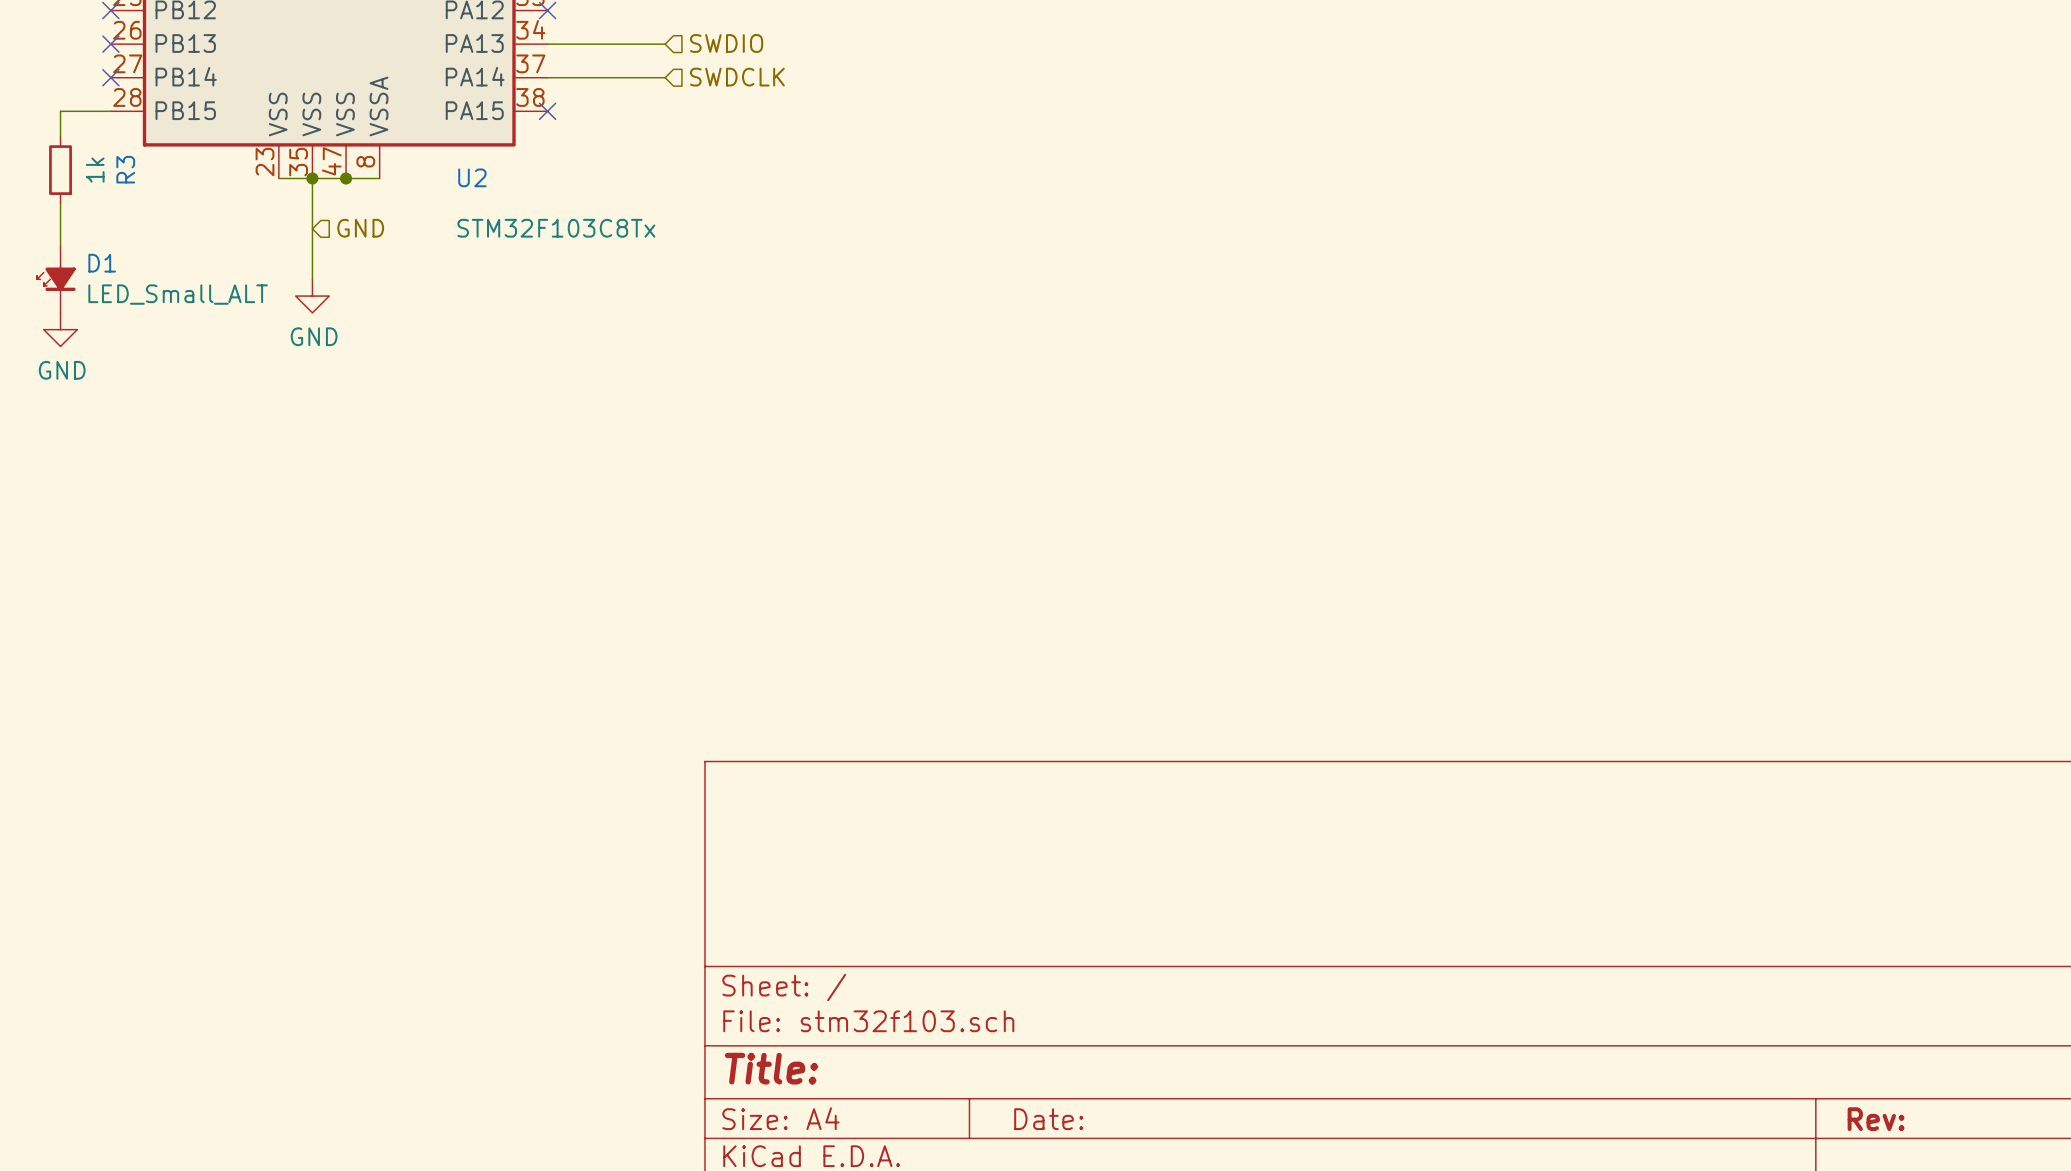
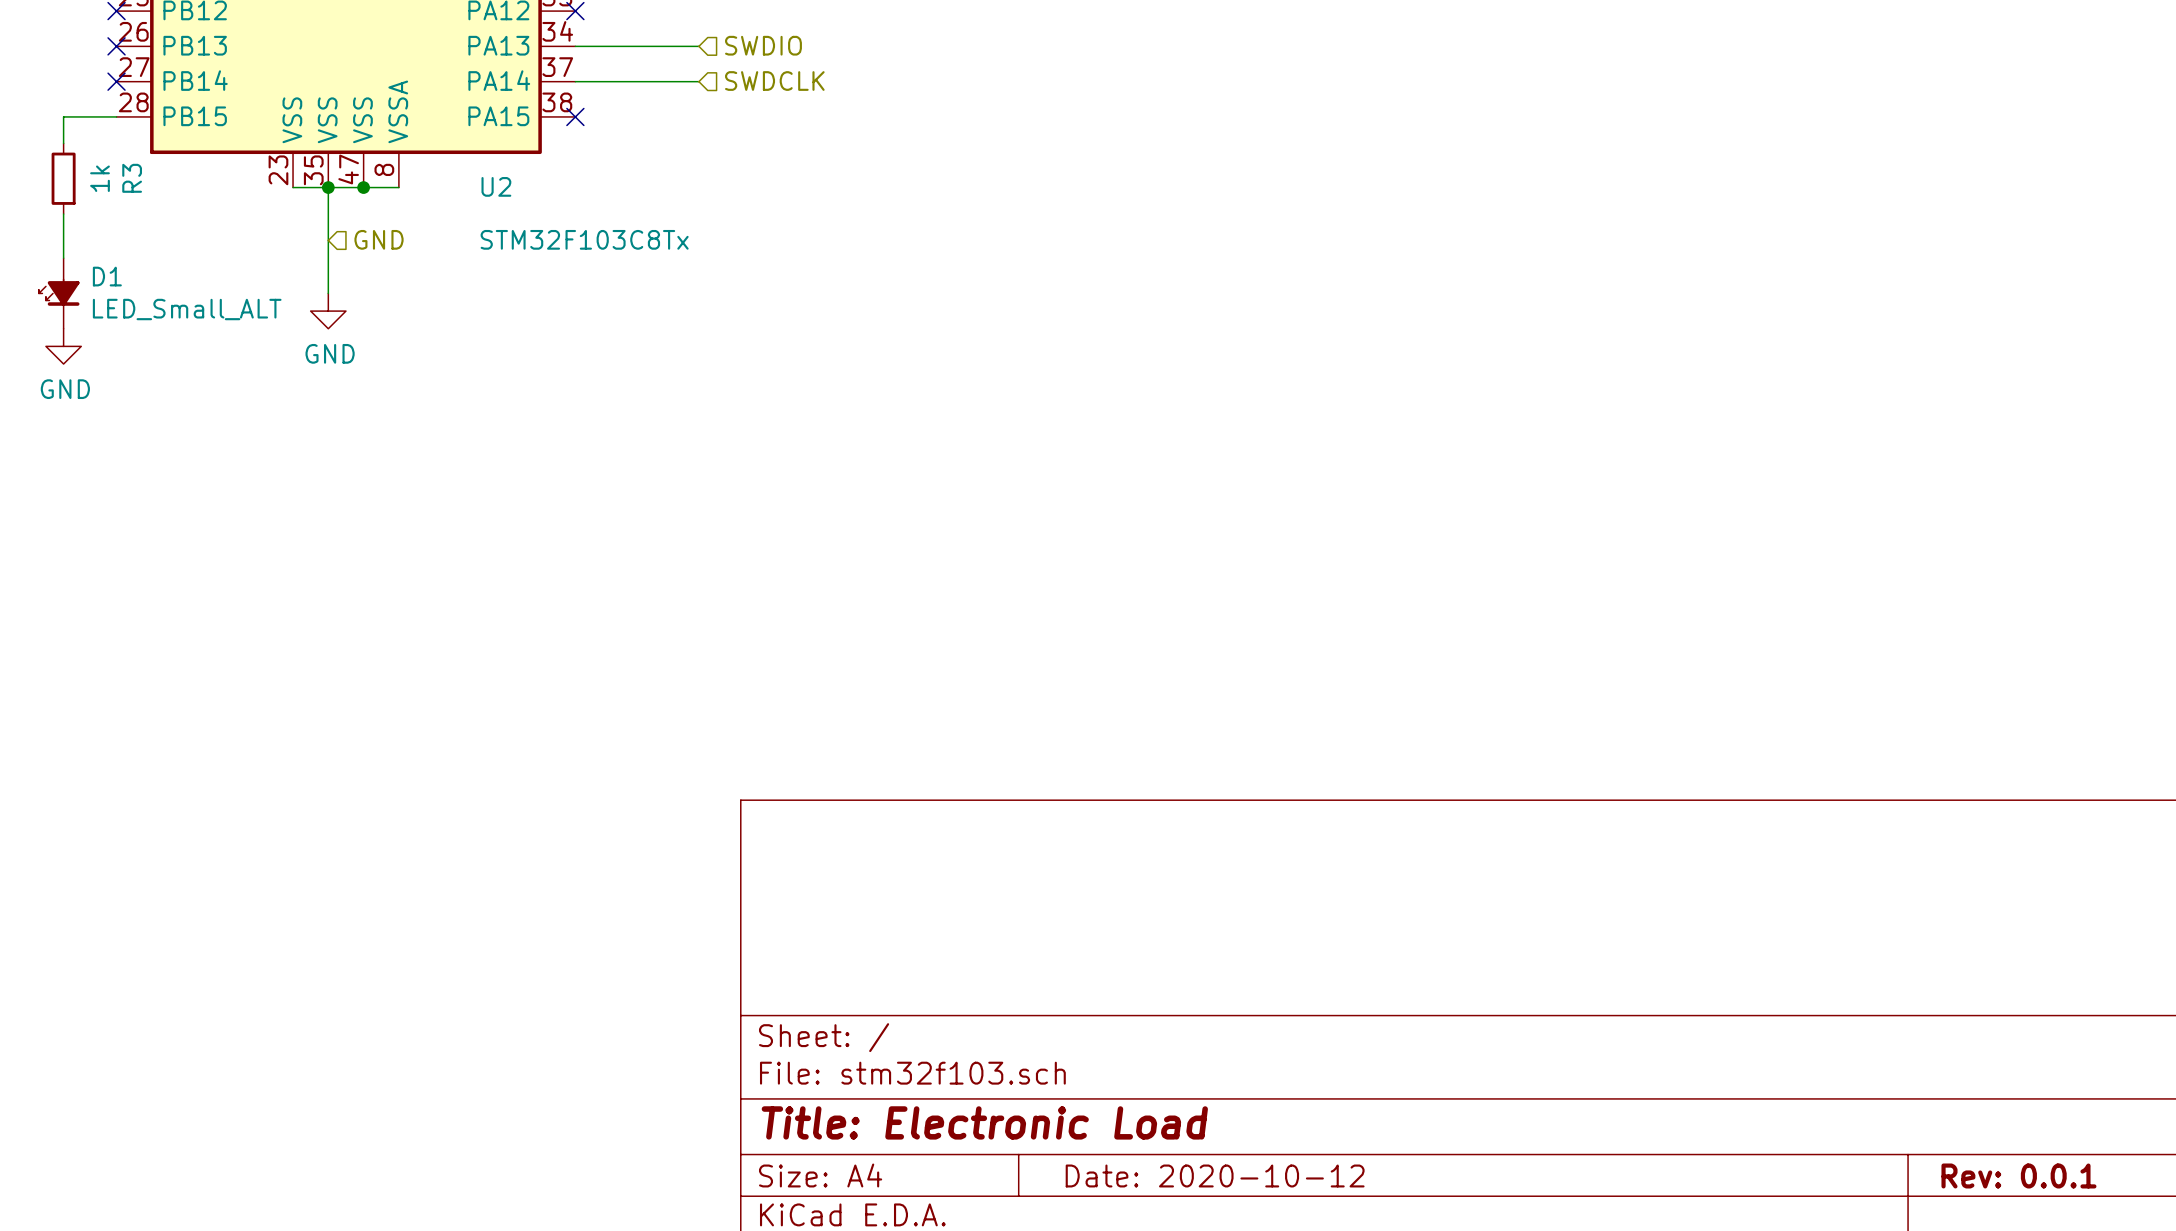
title block: Title: (771, 1068) -> Title: Electronic Load (984, 1122)
title block: Date: (1048, 1119) -> Date: 2020-10-12 (1215, 1175)
title block: Rev: (1876, 1119) -> Rev: 0.0.1 (2018, 1175)

